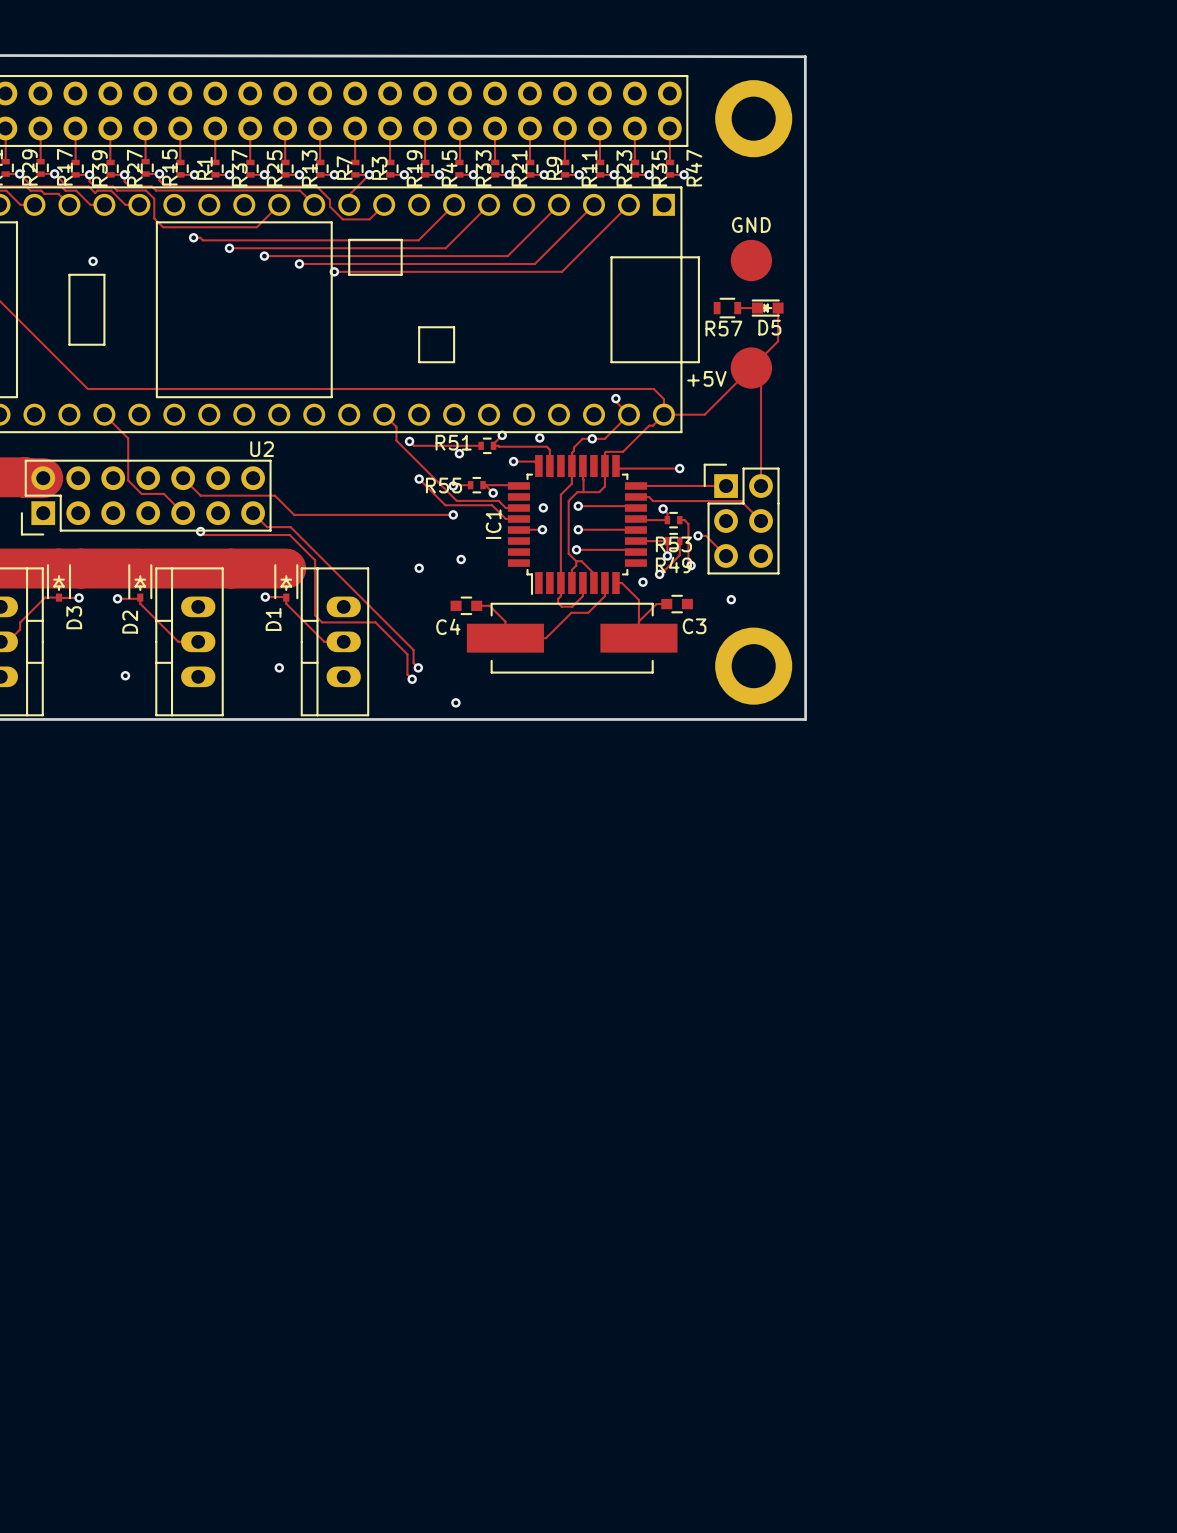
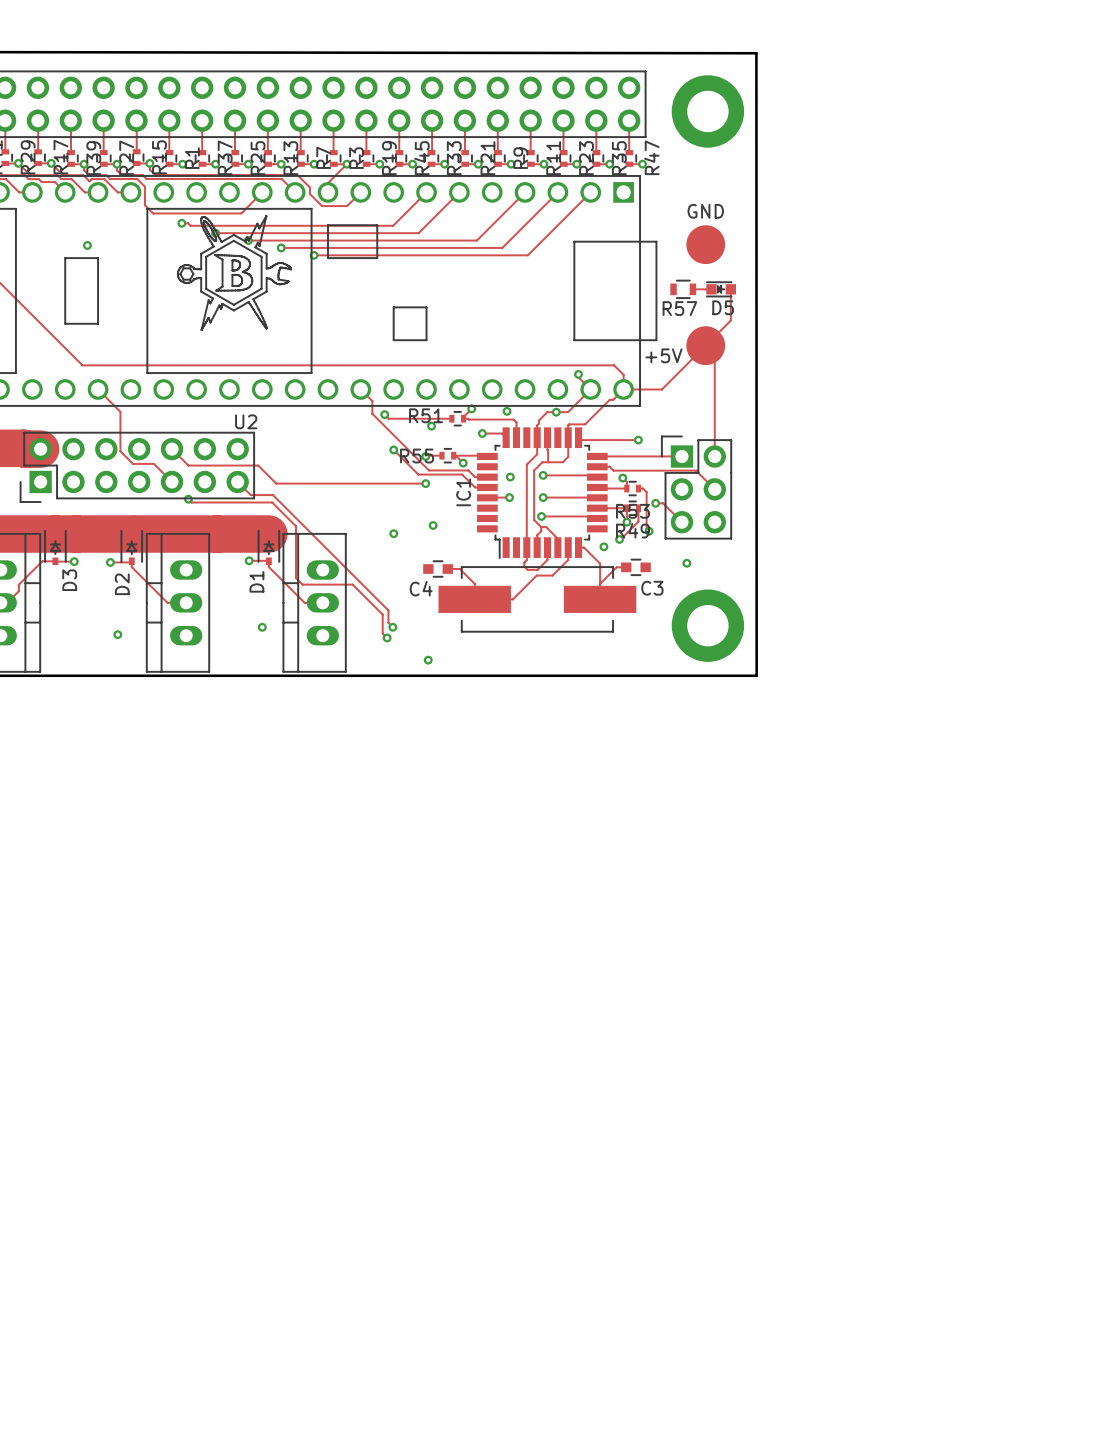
drawing: none -> [176, 215, 293, 331]

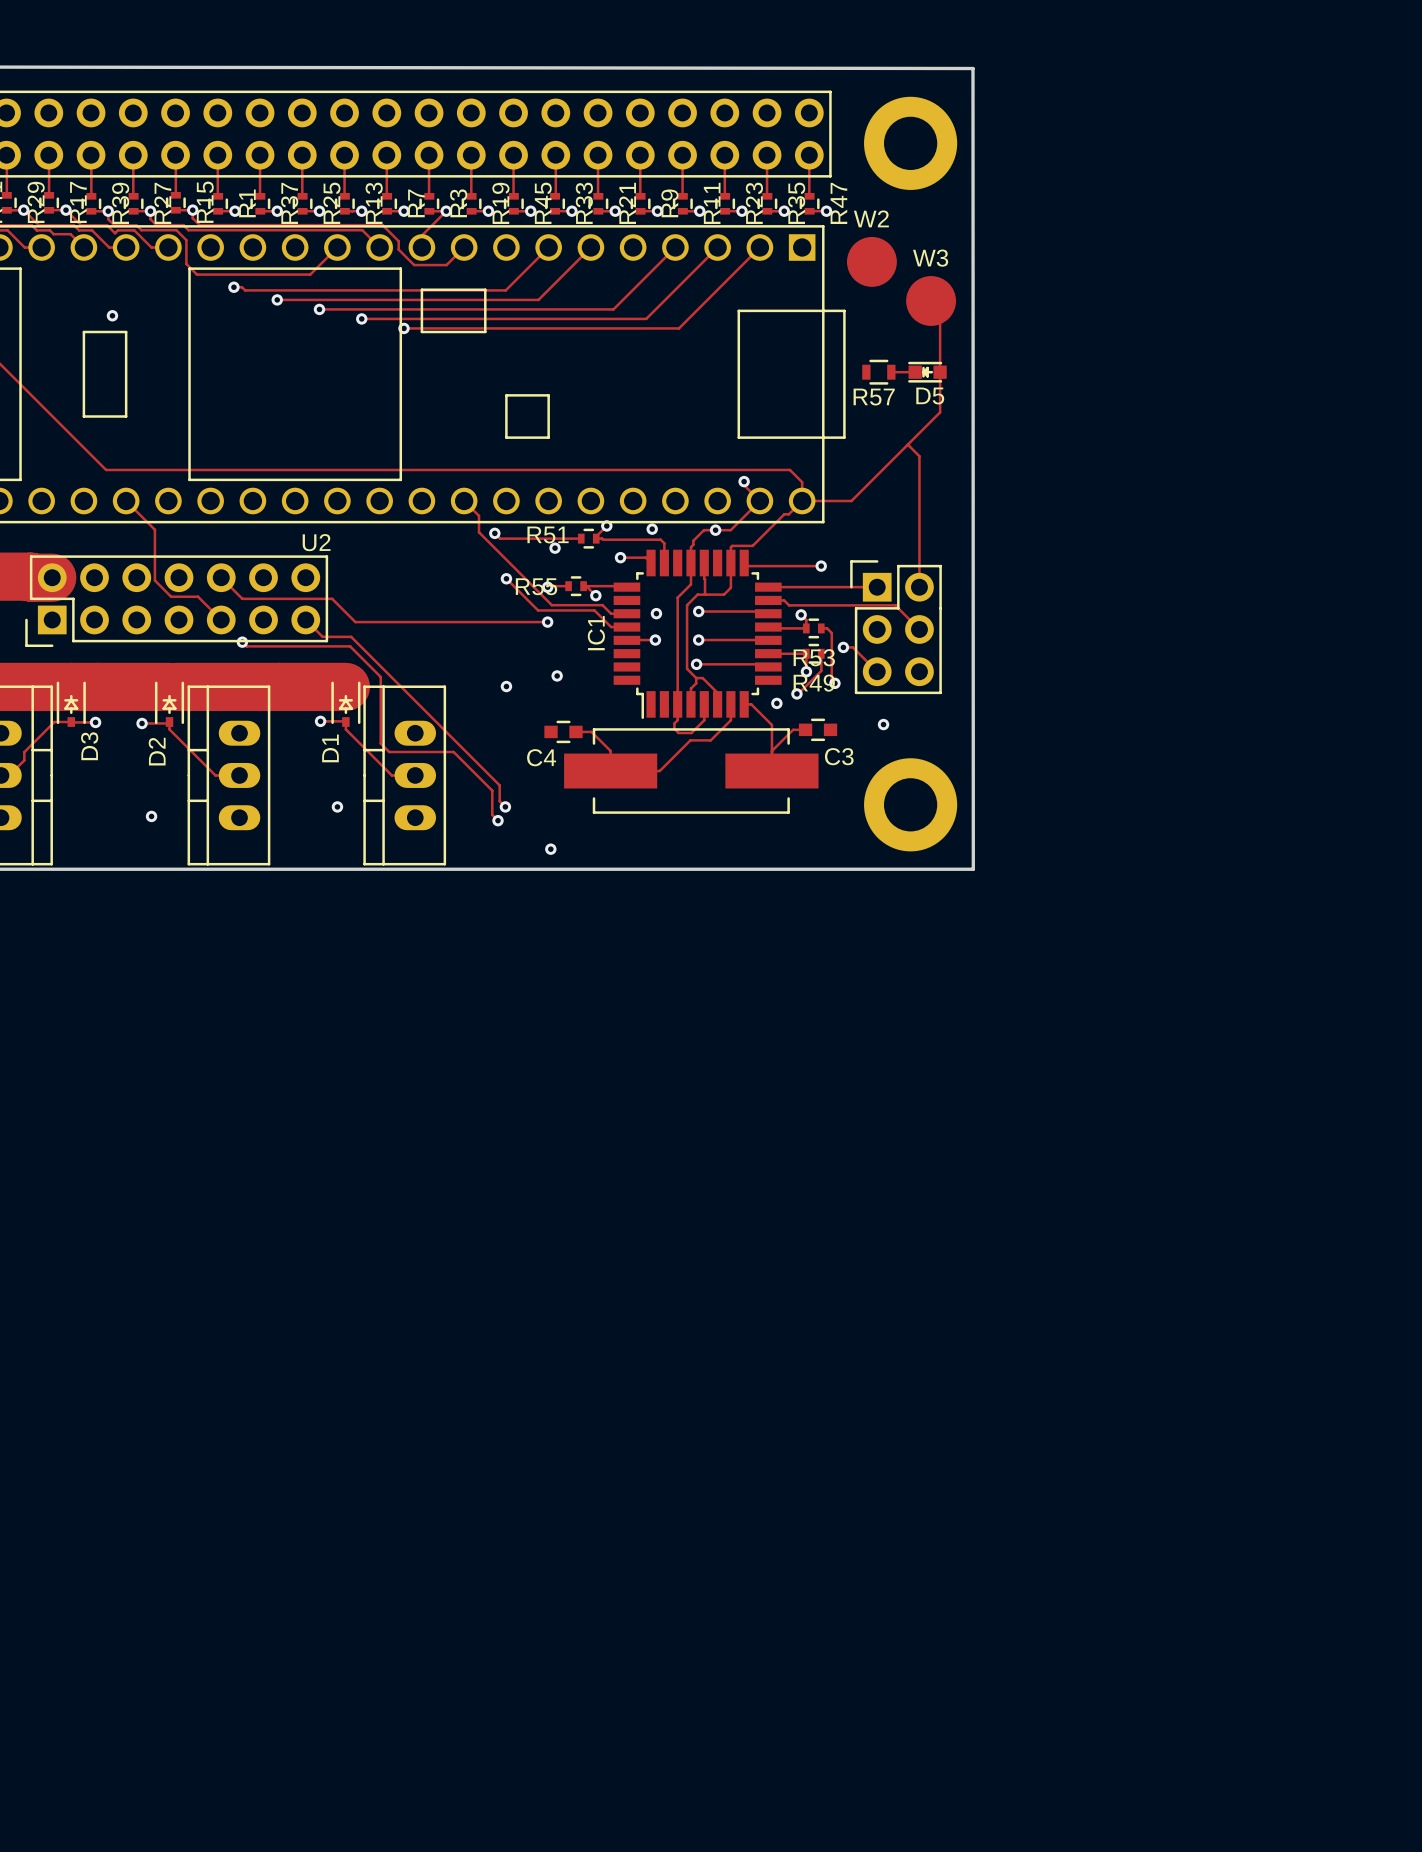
W2: none -> (871, 261)
drawing: [176, 215, 293, 331] -> none
track: none -> (931, 300) (940, 310) (940, 372)
W3: none -> (931, 300)
GND: (705, 244) -> none
+5V: (705, 345) -> none

